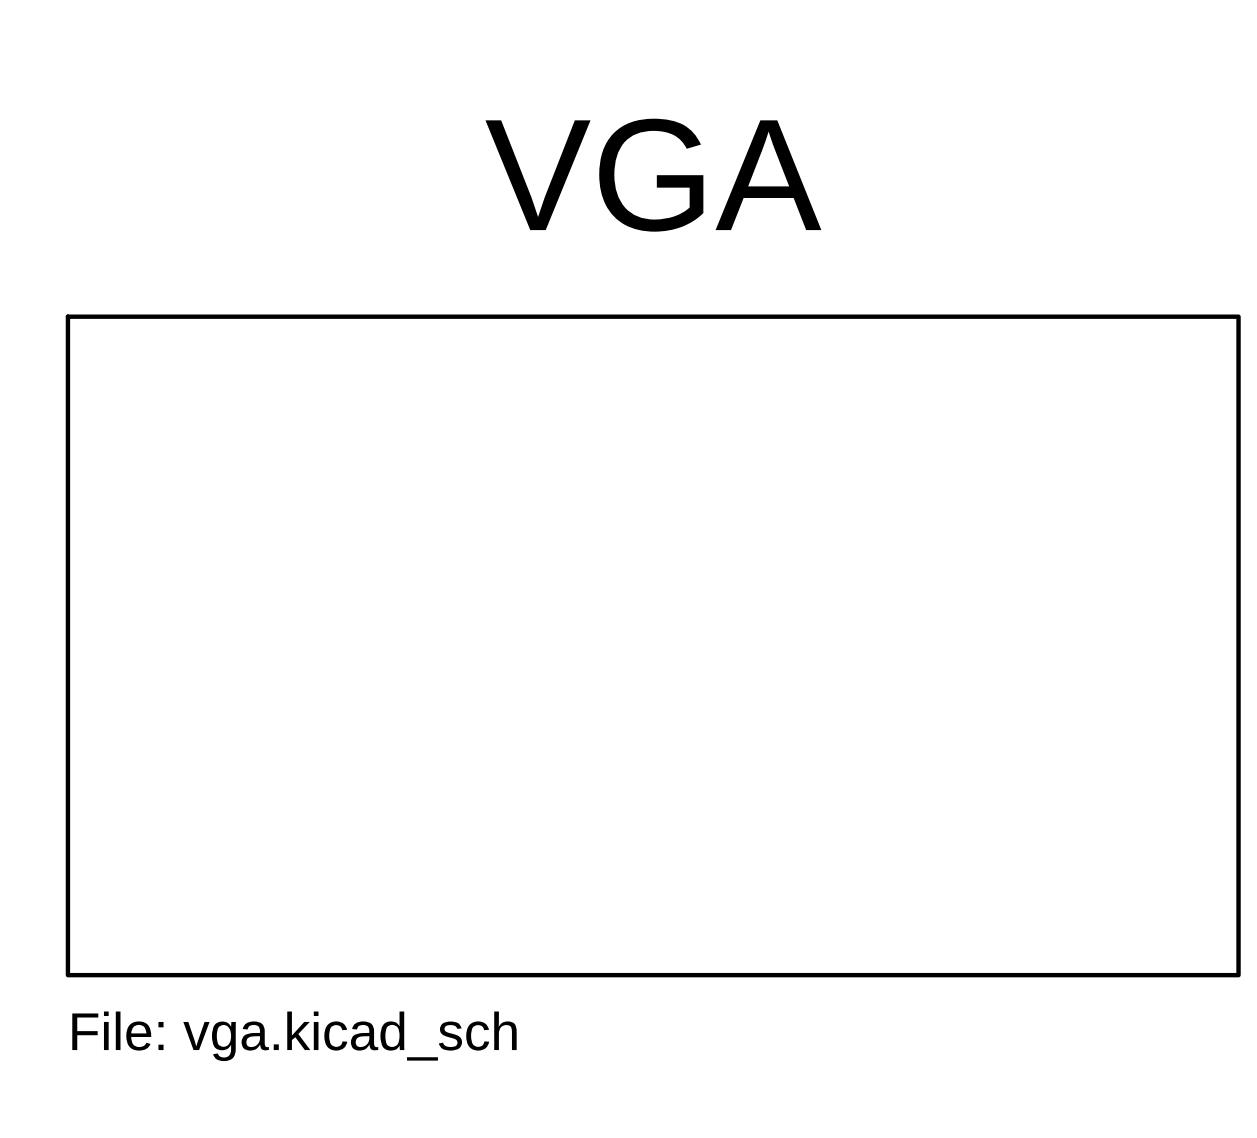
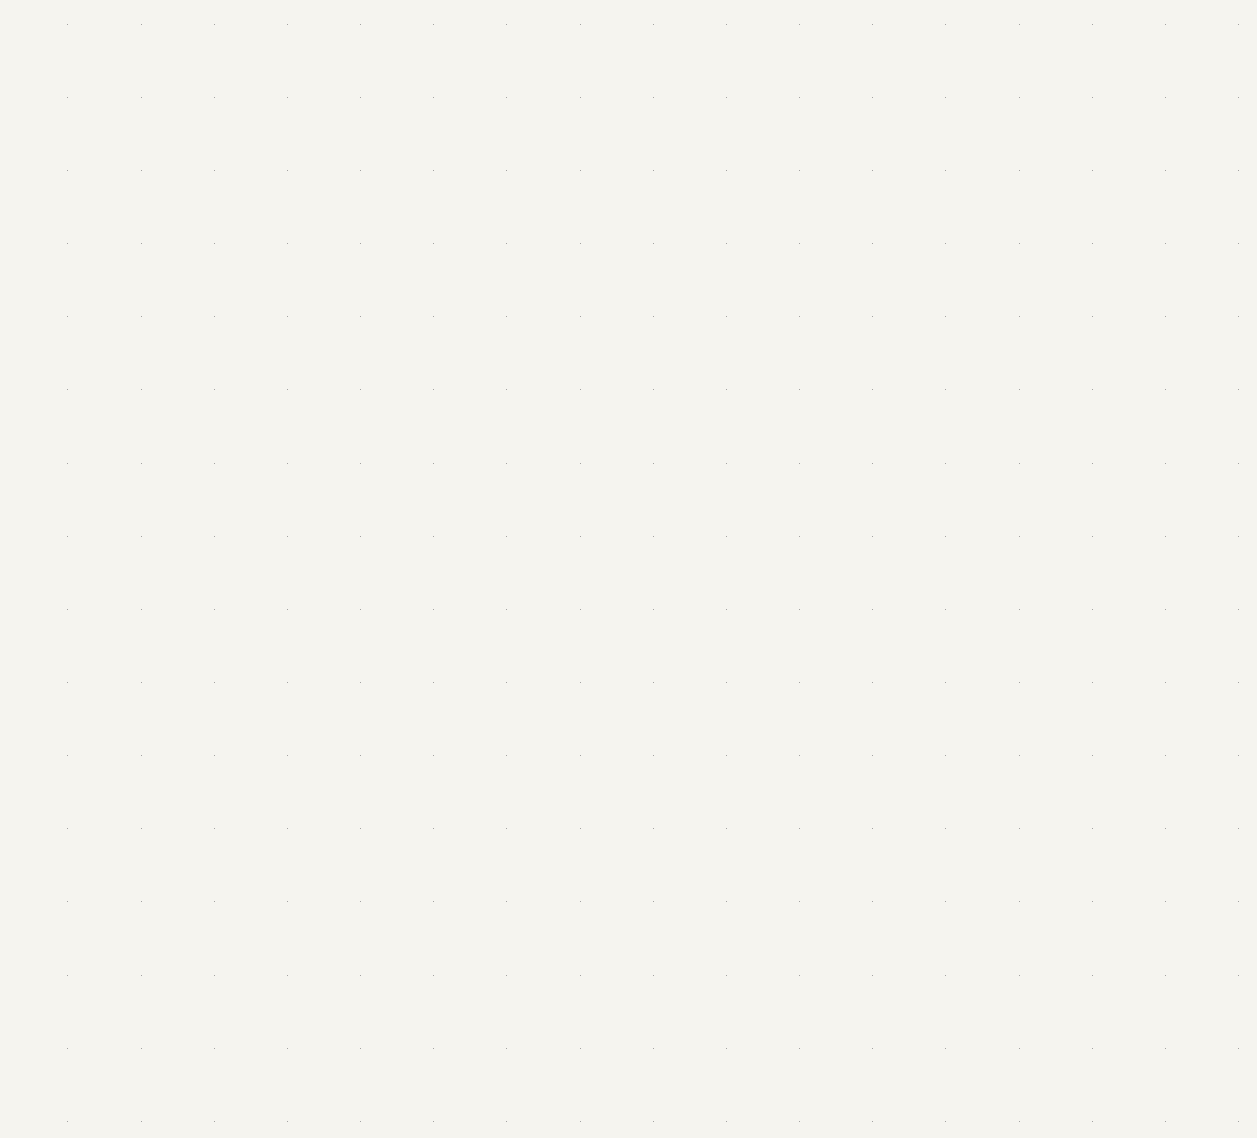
sheet VGA: File: vga.kicad_sch (653, 645) -> none

